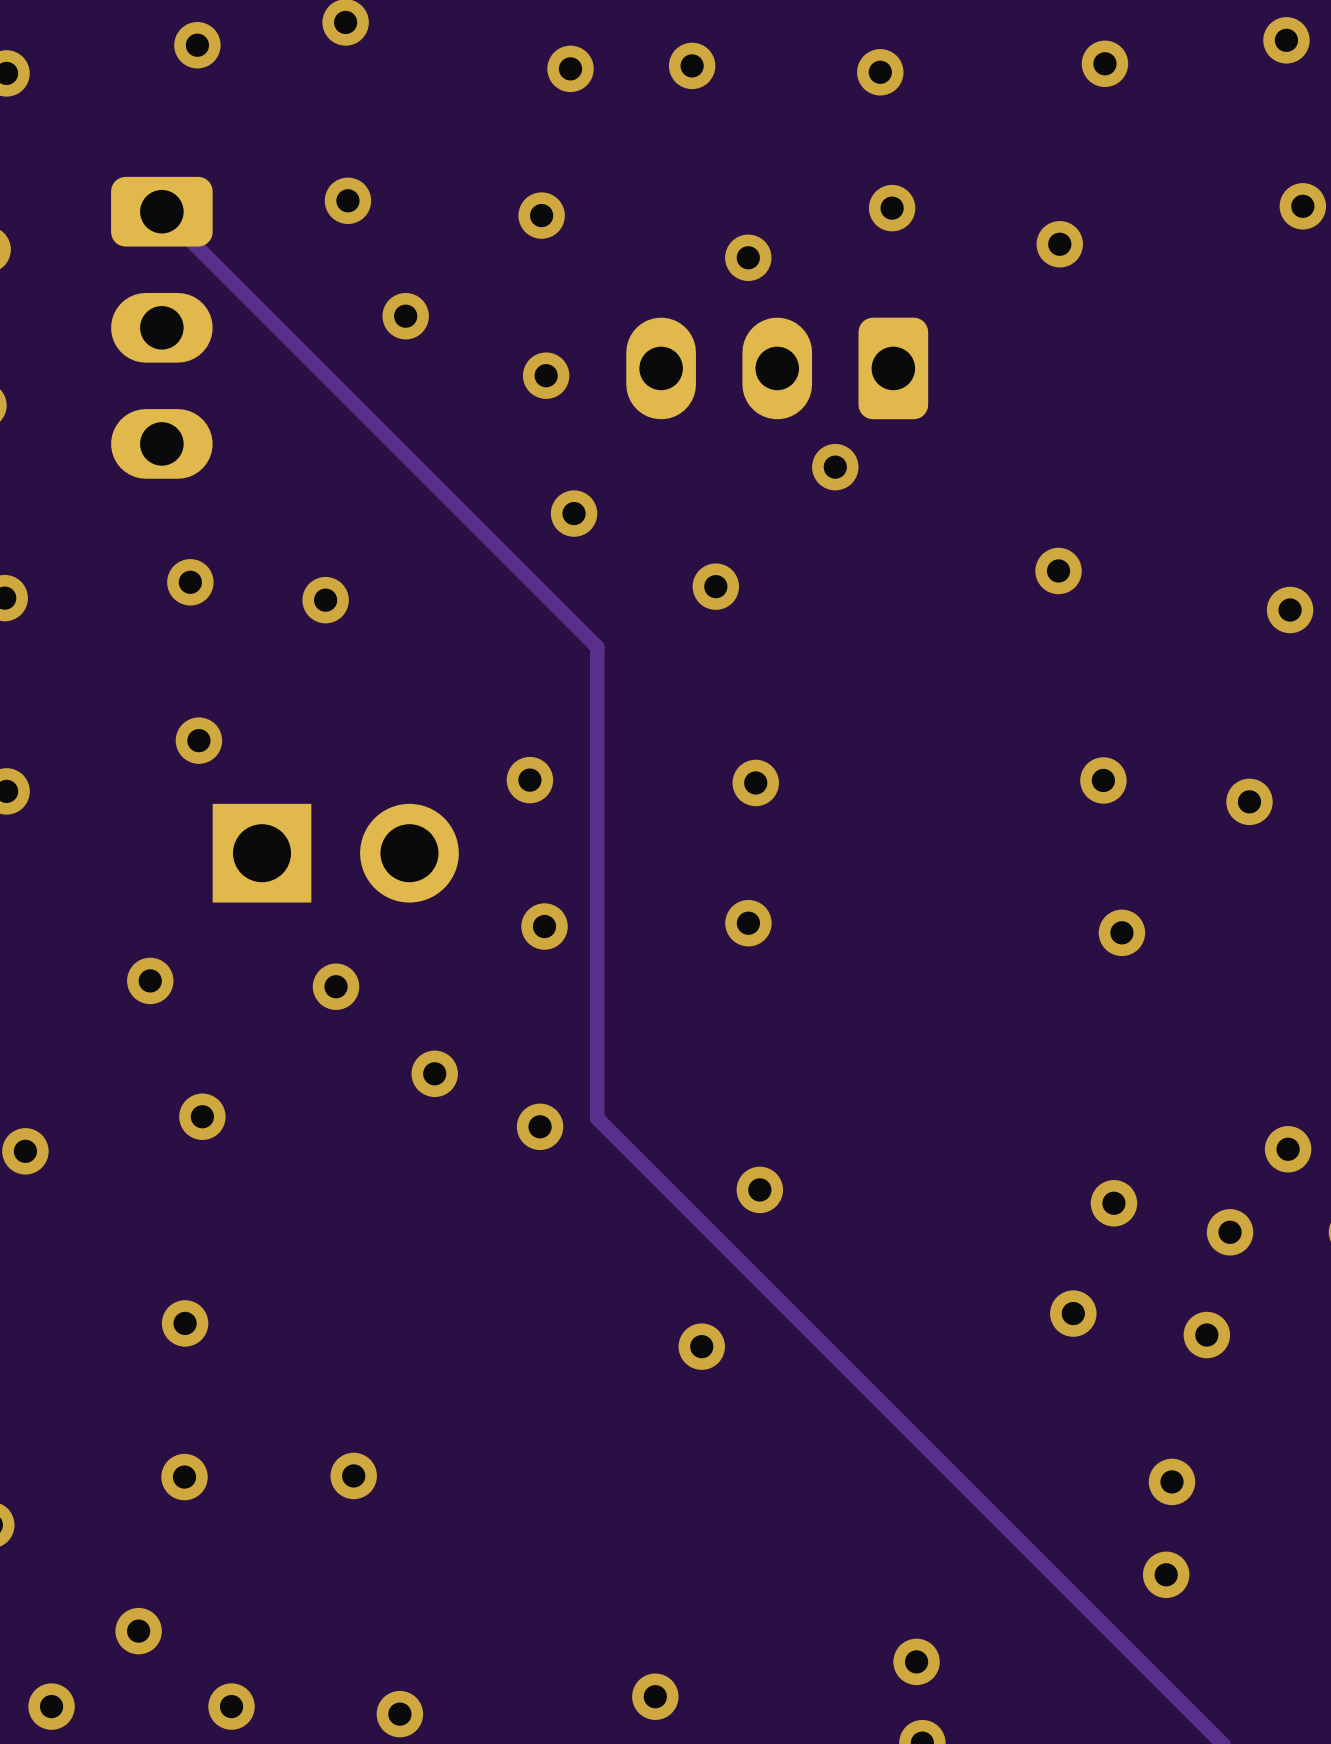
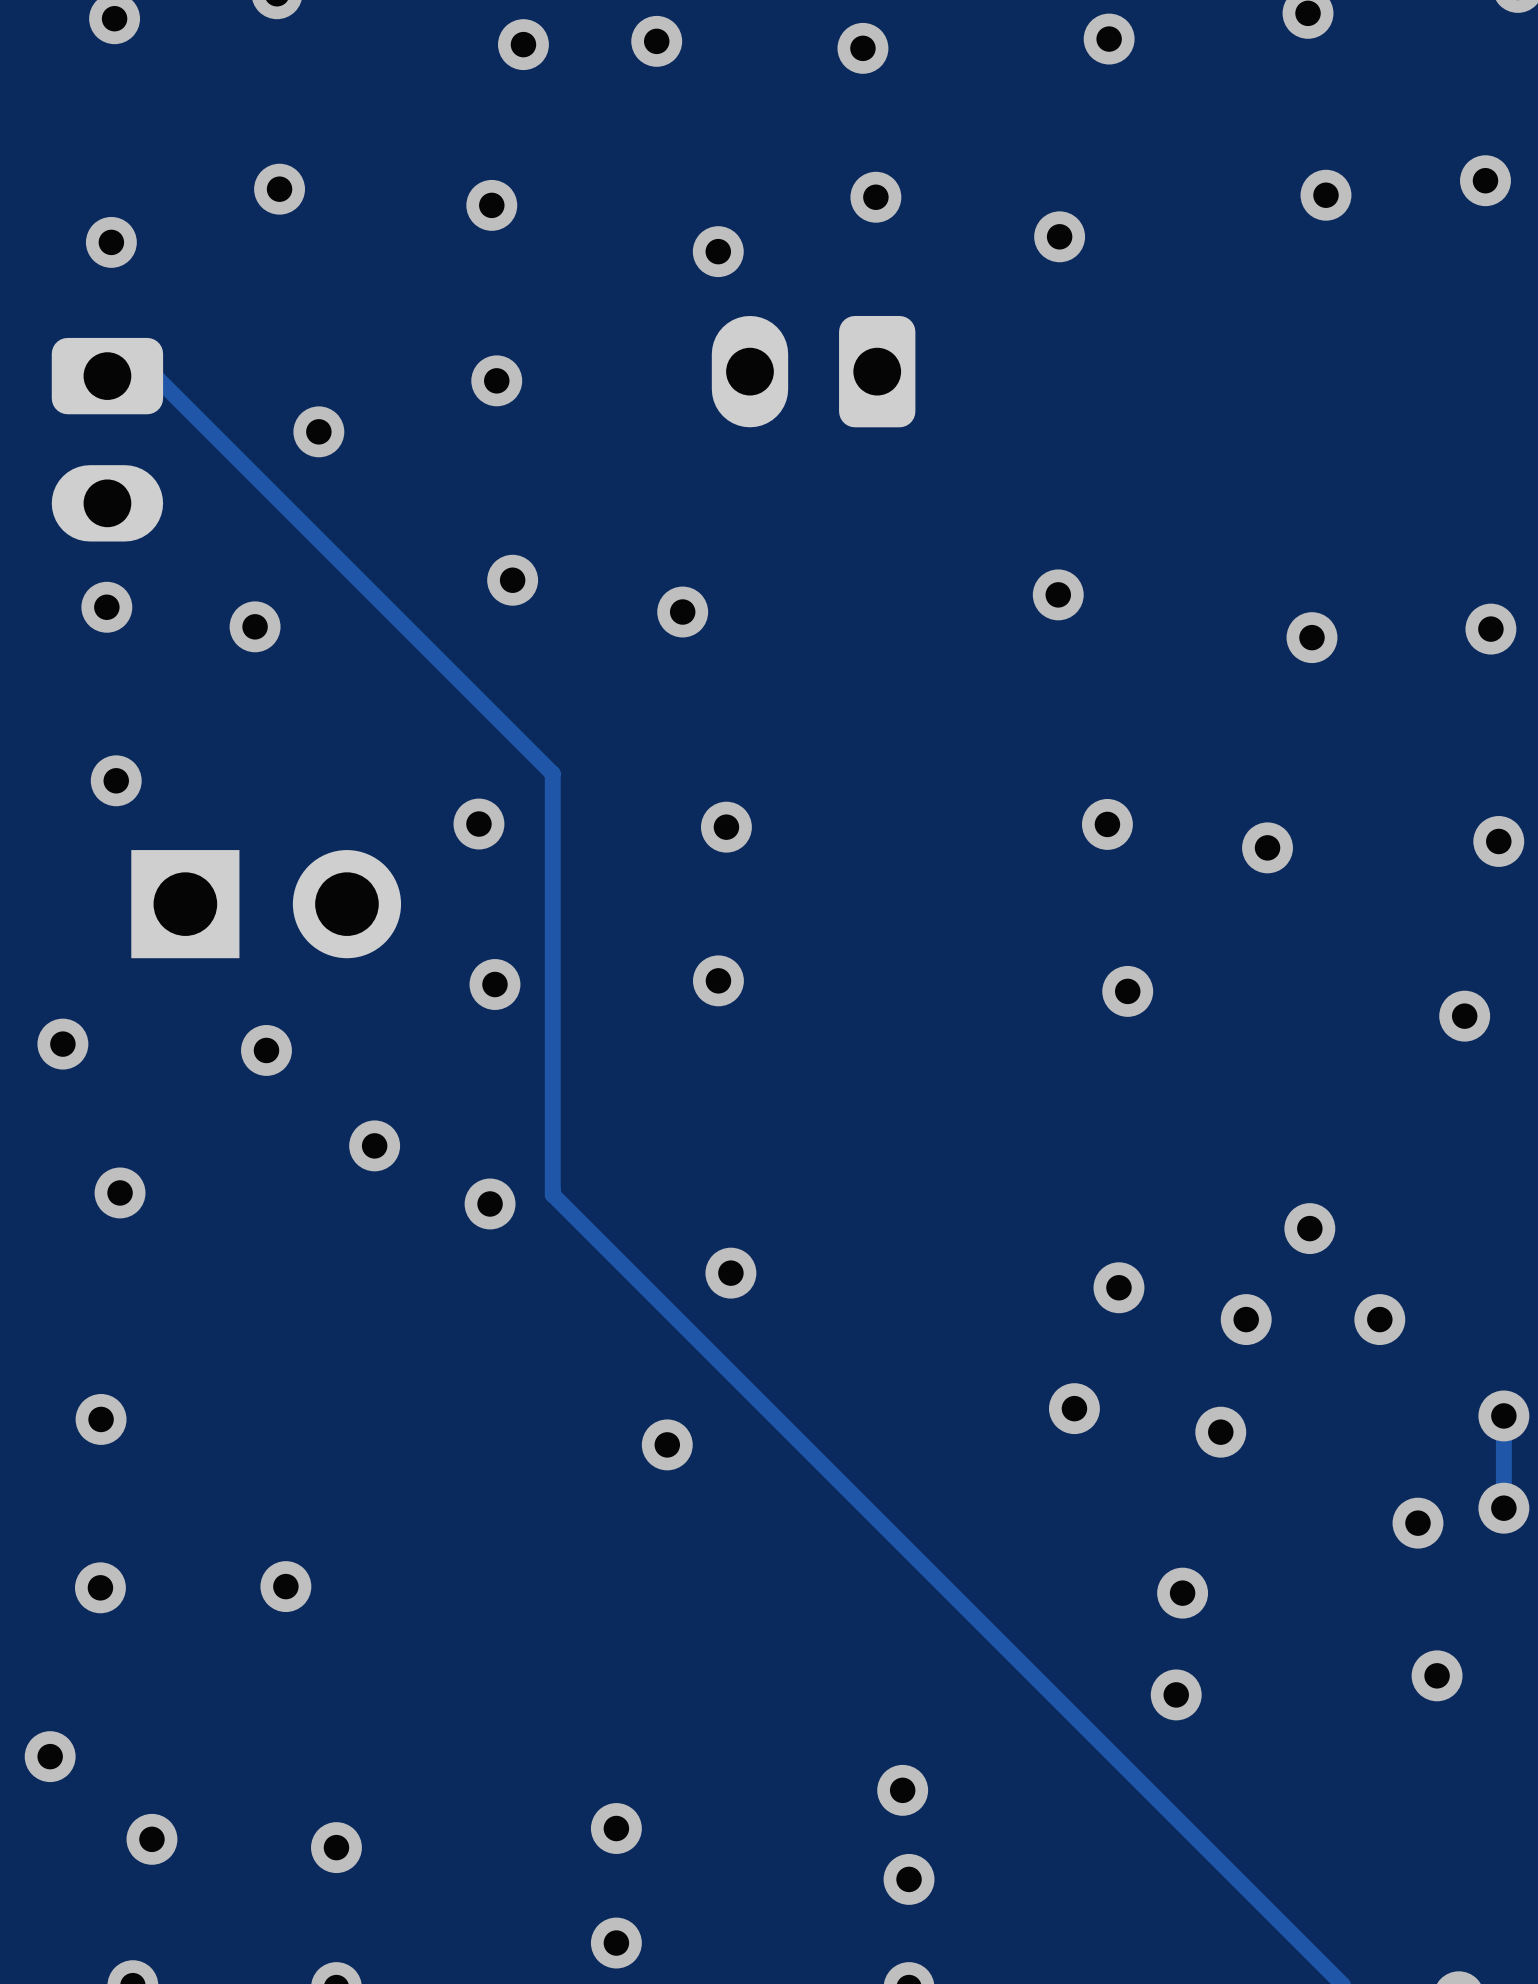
track: (161, 211) (597, 647) (597, 734) -> (108, 367) (146, 367) (552, 773)
via: none -> (111, 242)
via: (405, 316) -> none
part: (161, 327) -> none
part: none -> (813, 371)
part: (777, 368) -> none
via: none -> (318, 431)
part: none -> (107, 439)
via: (835, 467) -> none
via position: (574, 513) -> (512, 580)

